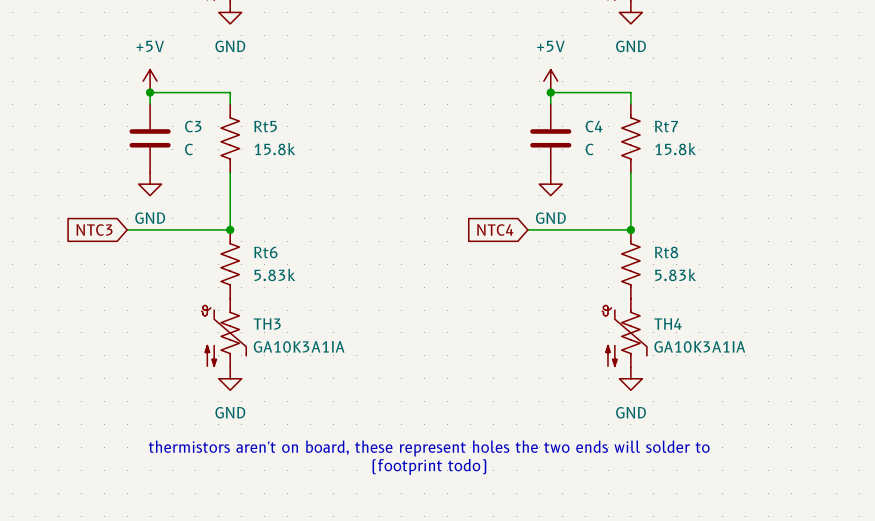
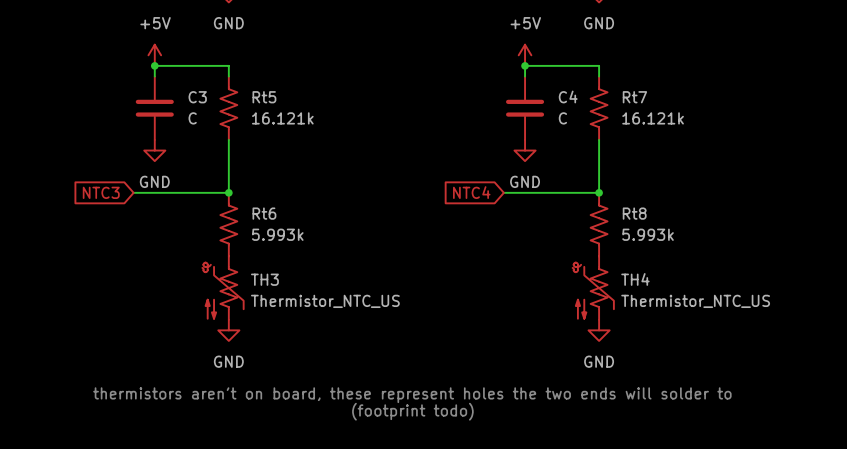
Rt5 value: 15.8k (274, 149) -> 16.121k (282, 118)
Rt7 value: 15.8k (675, 149) -> 16.121k (653, 118)
Rt6 value: 5.83k (274, 275) -> 5.993k (277, 234)
Rt8 value: 5.83k (675, 275) -> 5.993k (648, 234)
TH3 value: GA10K3A1IA (299, 346) -> Thermistor_NTC_US (325, 301)
TH4 value: GA10K3A1IA (699, 346) -> Thermistor_NTC_US (695, 301)

